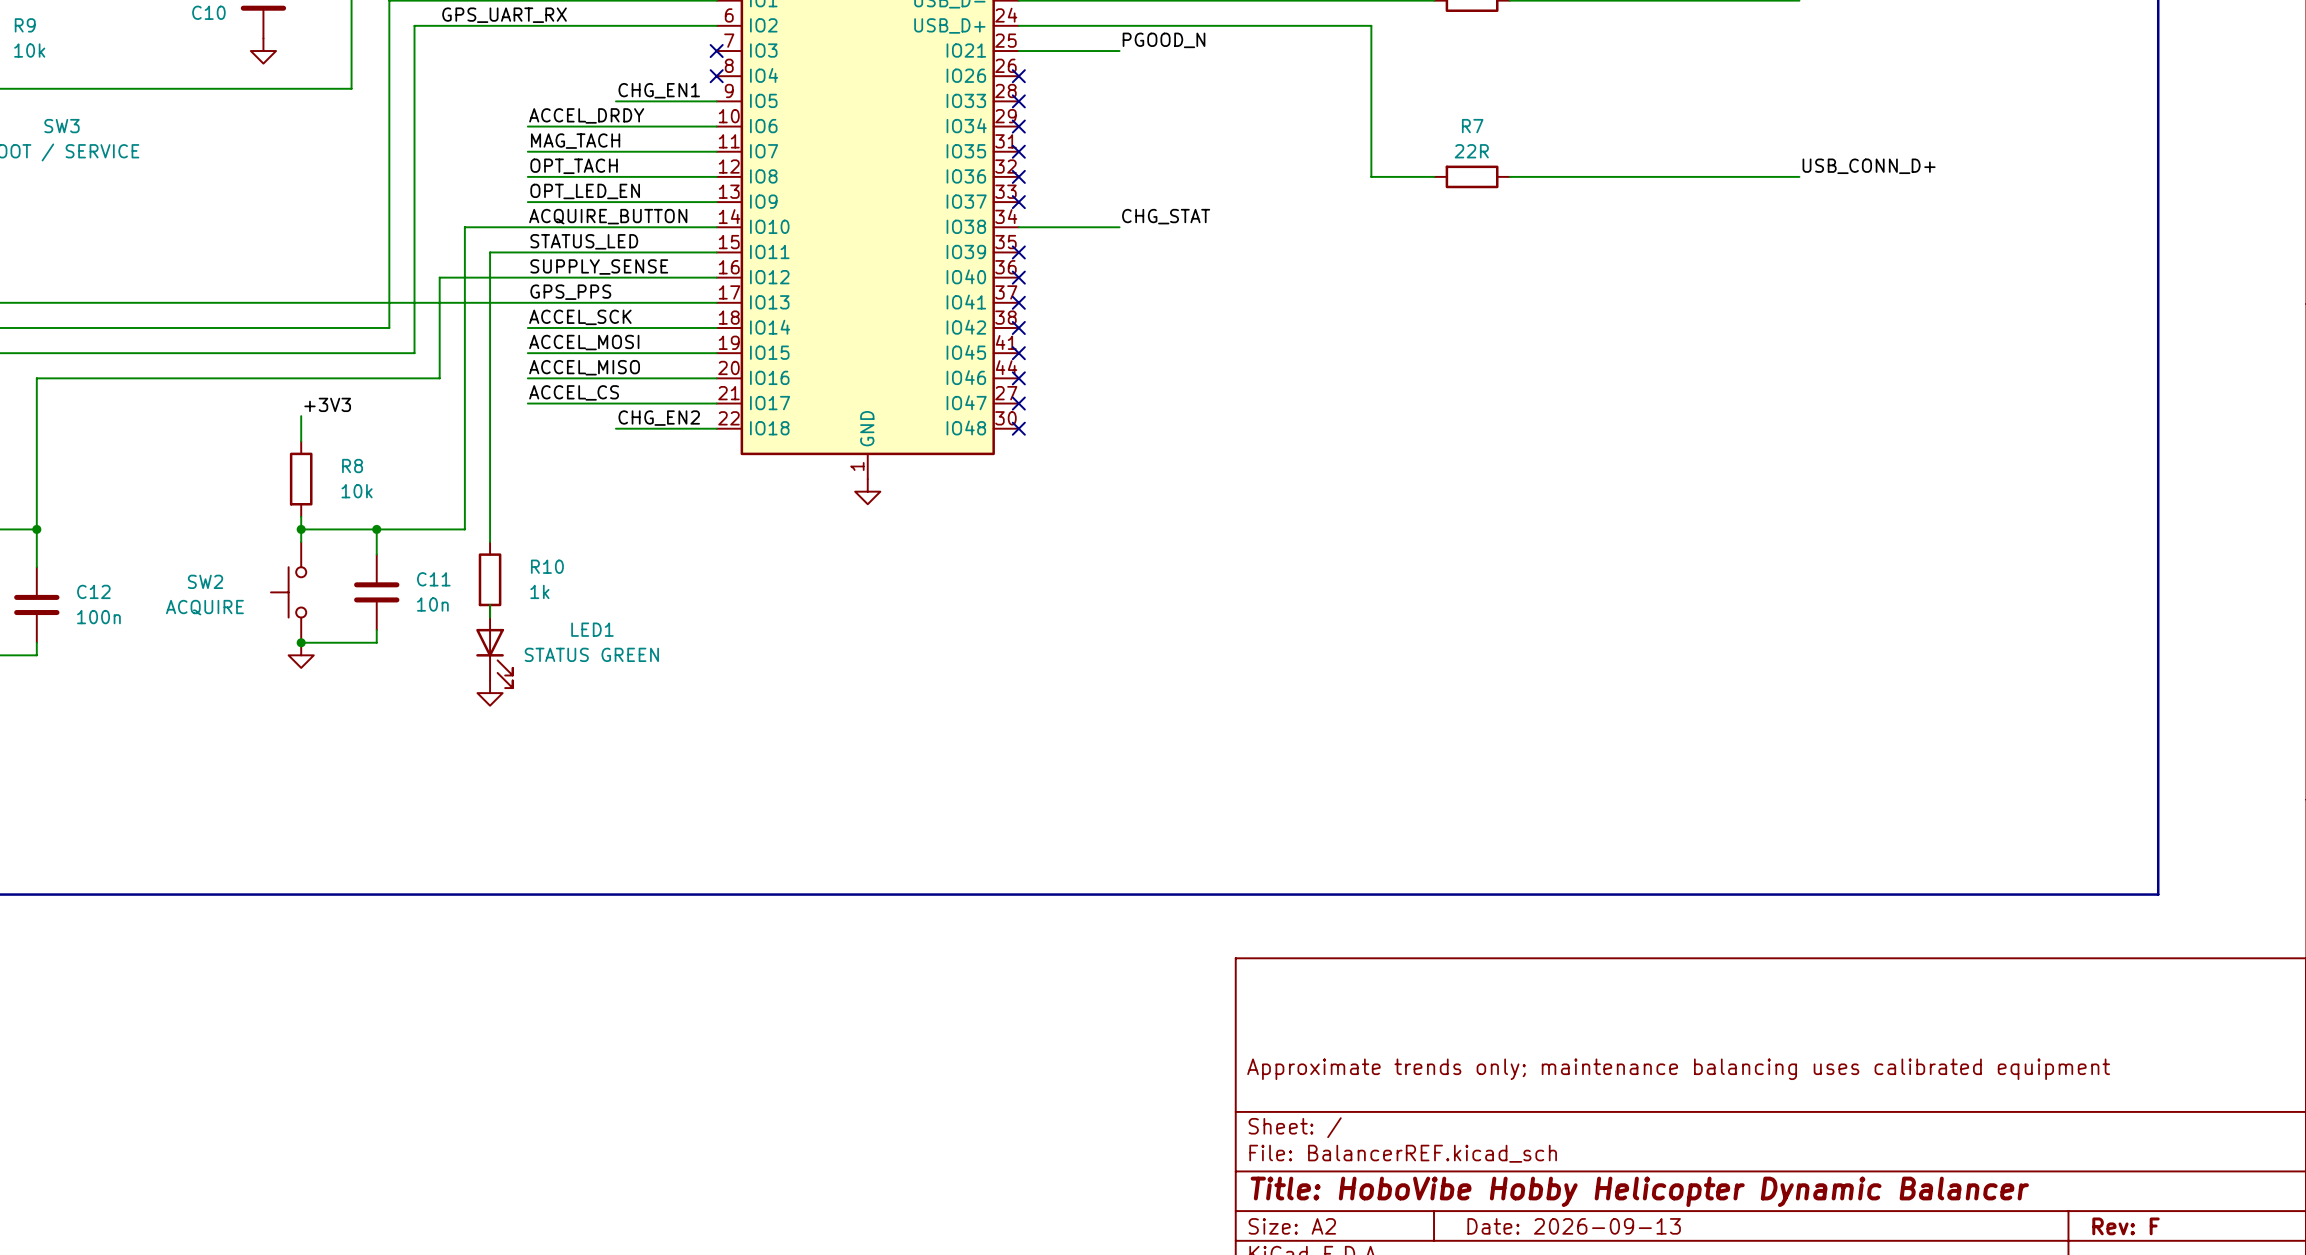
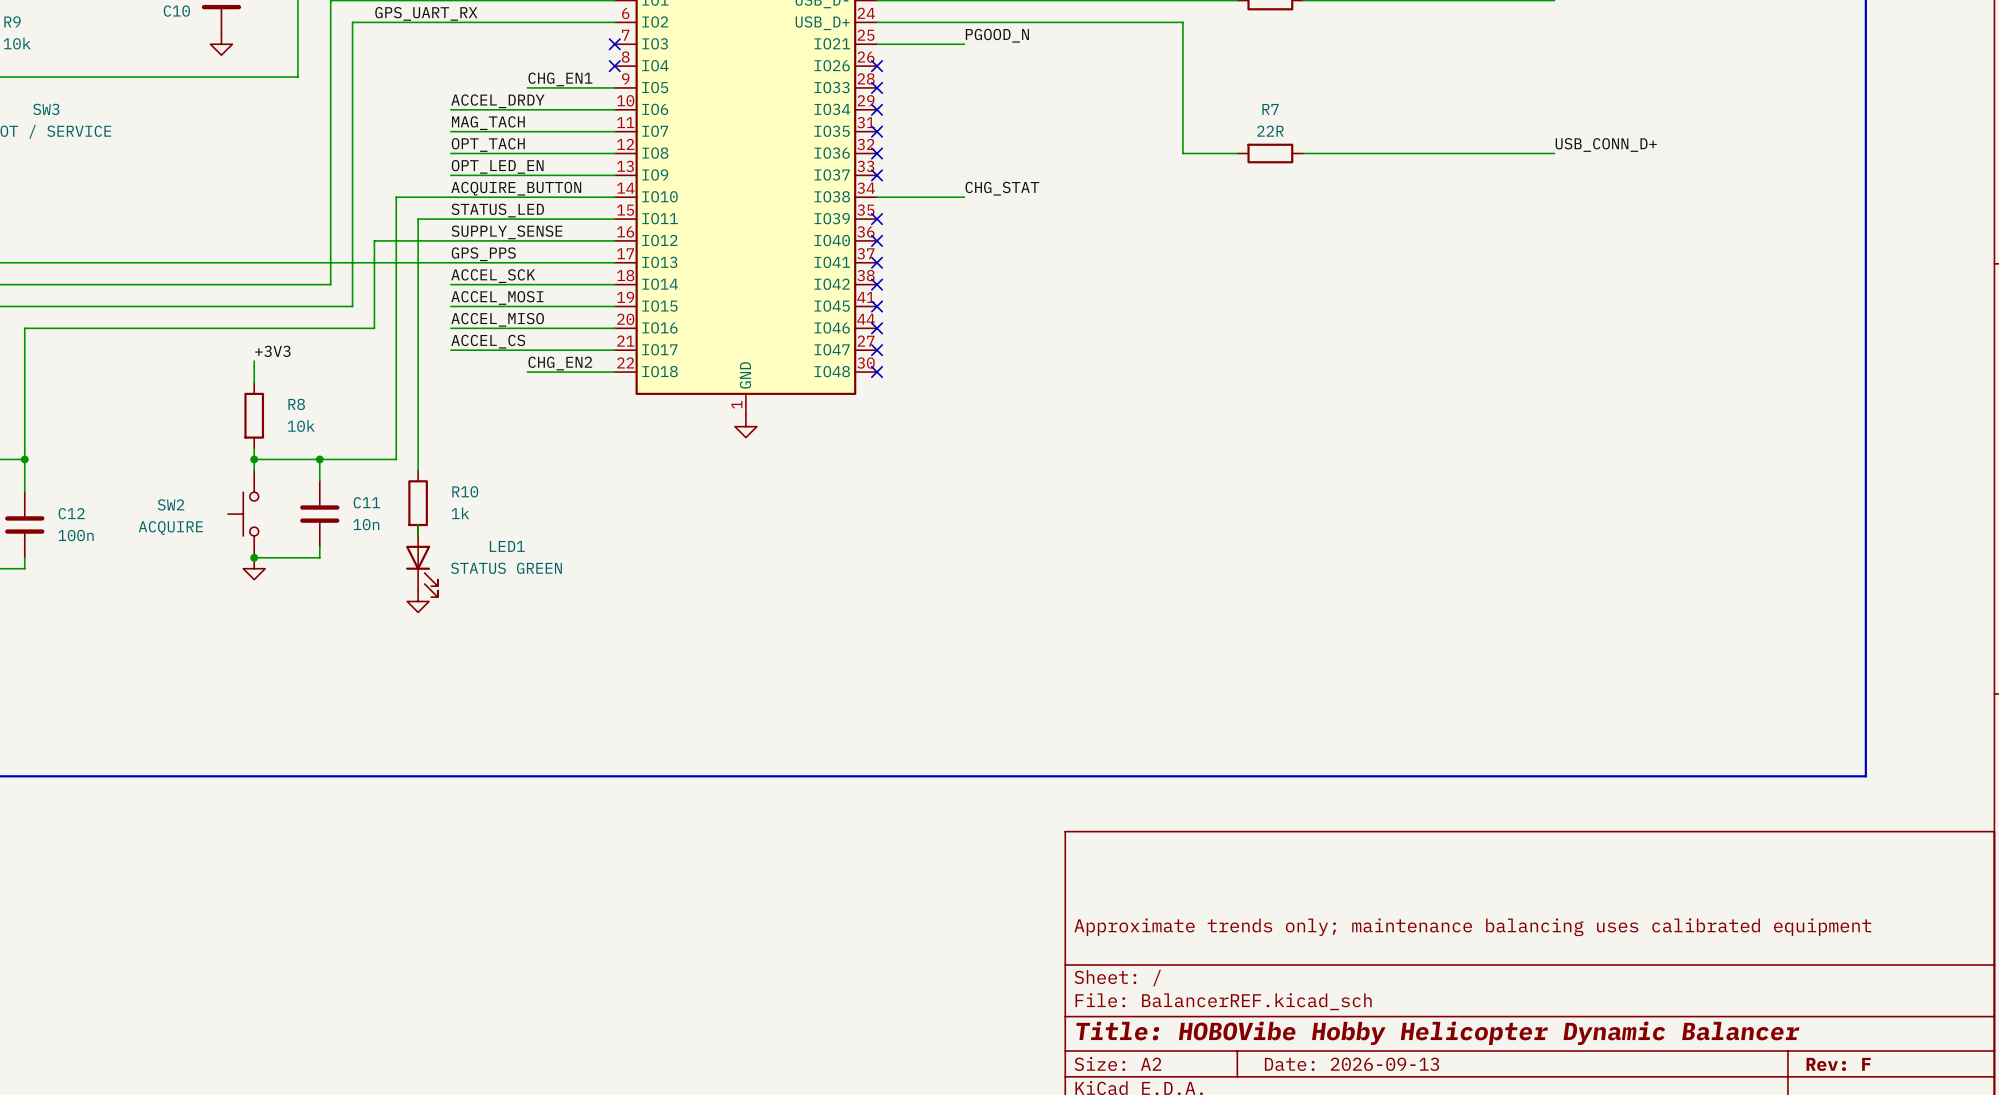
title block: Title: HoboVibe Hobby Helicopter Dynamic Balancer (1639, 1191) -> Title: HOBOVibe Hobby Helicopter Dynamic Balancer (1437, 1033)

